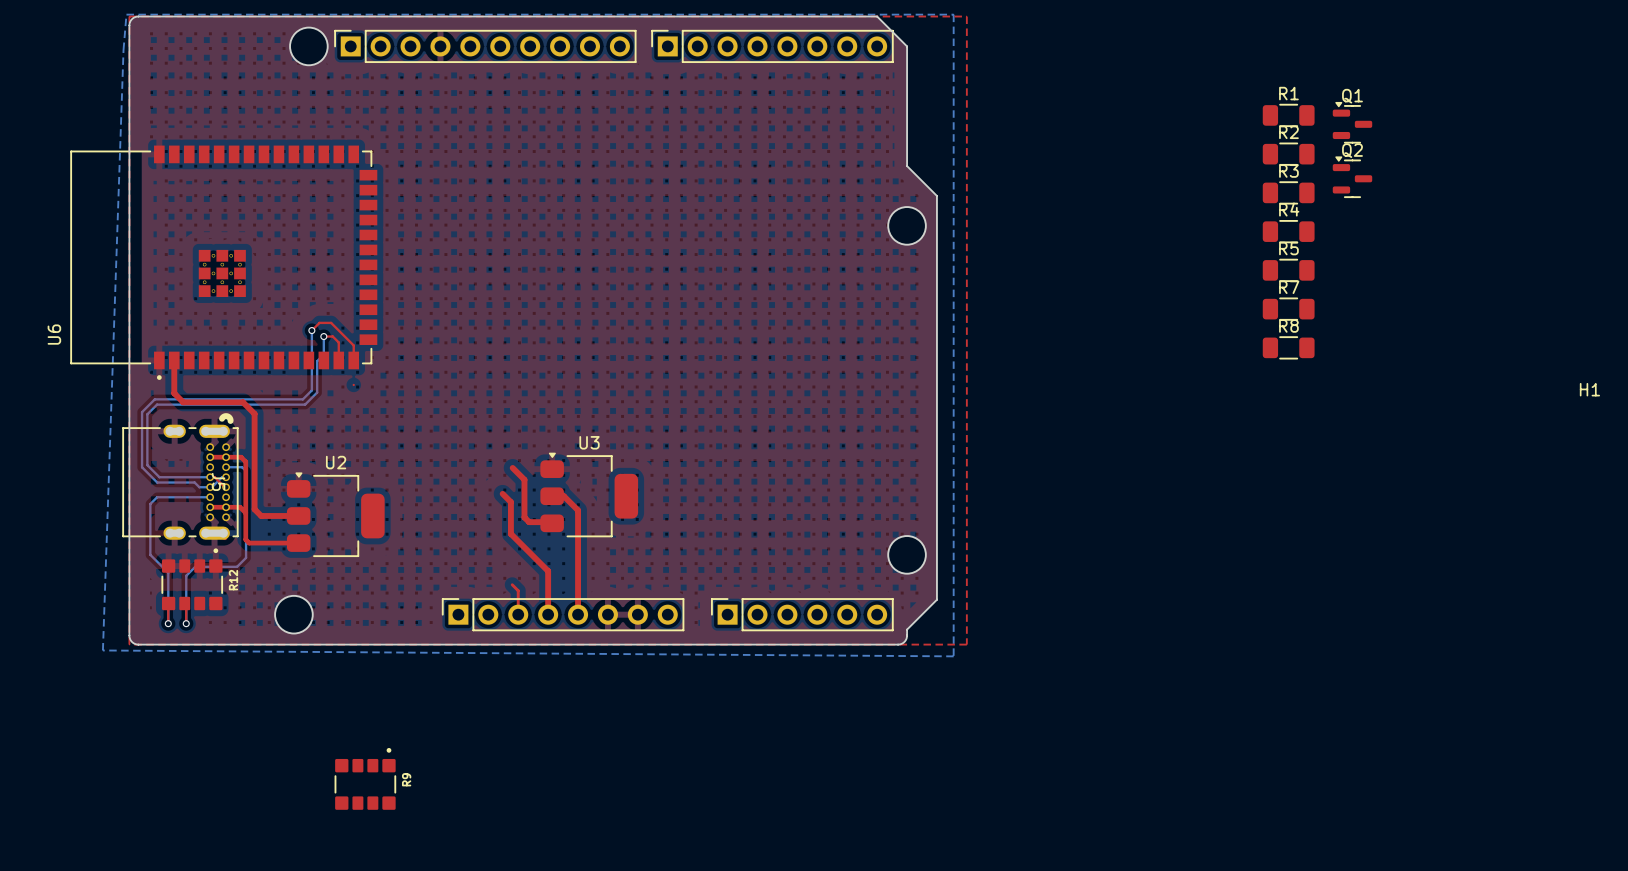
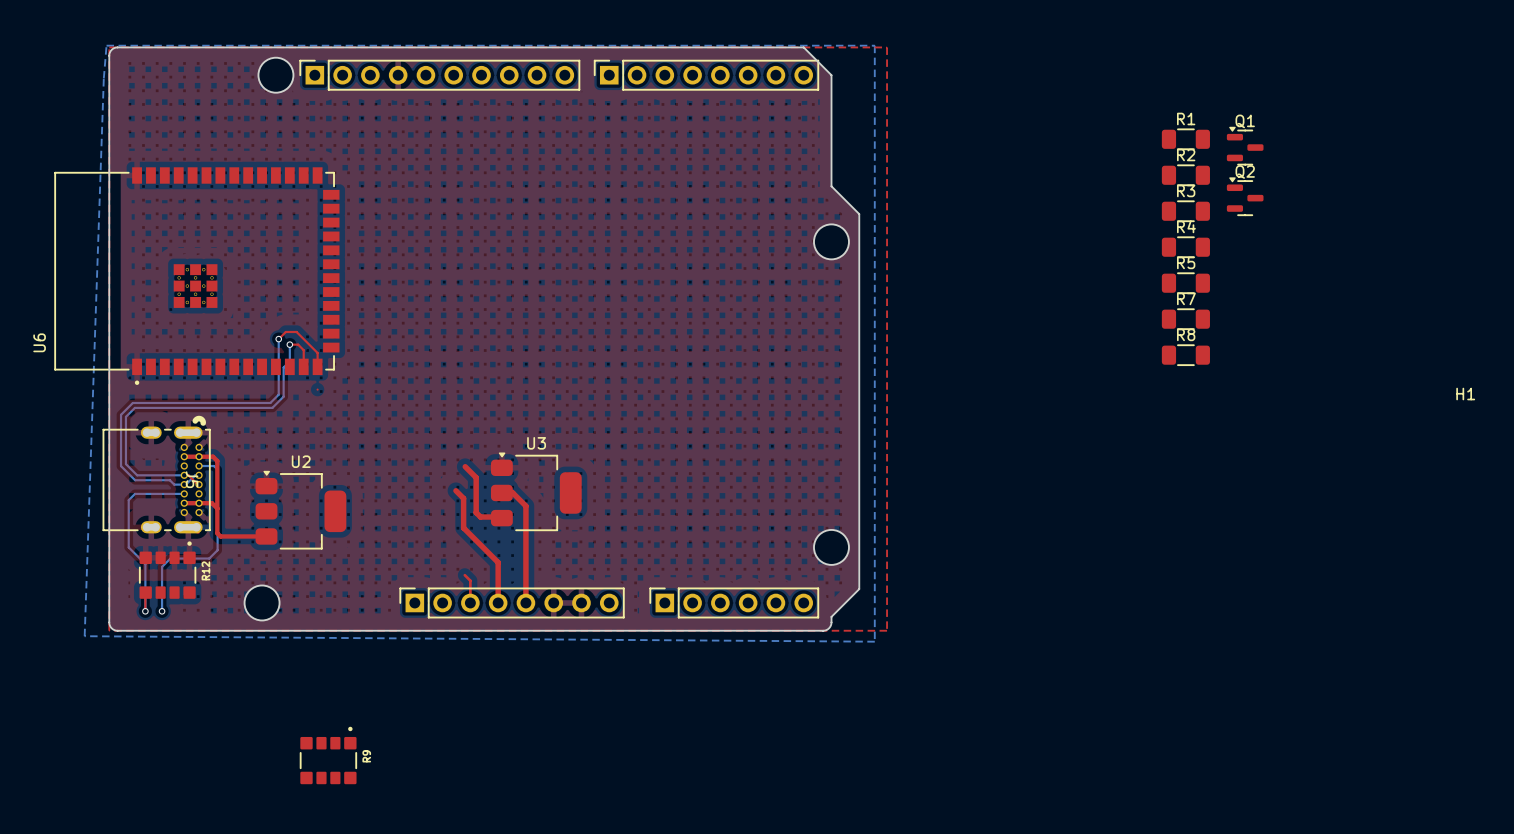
top track: (174, 360) (174, 393) (183, 402) (243, 402) (254, 413) (254, 509) (261, 515) (298, 515) -> none
top track: (184, 603) (186, 623) -> none

